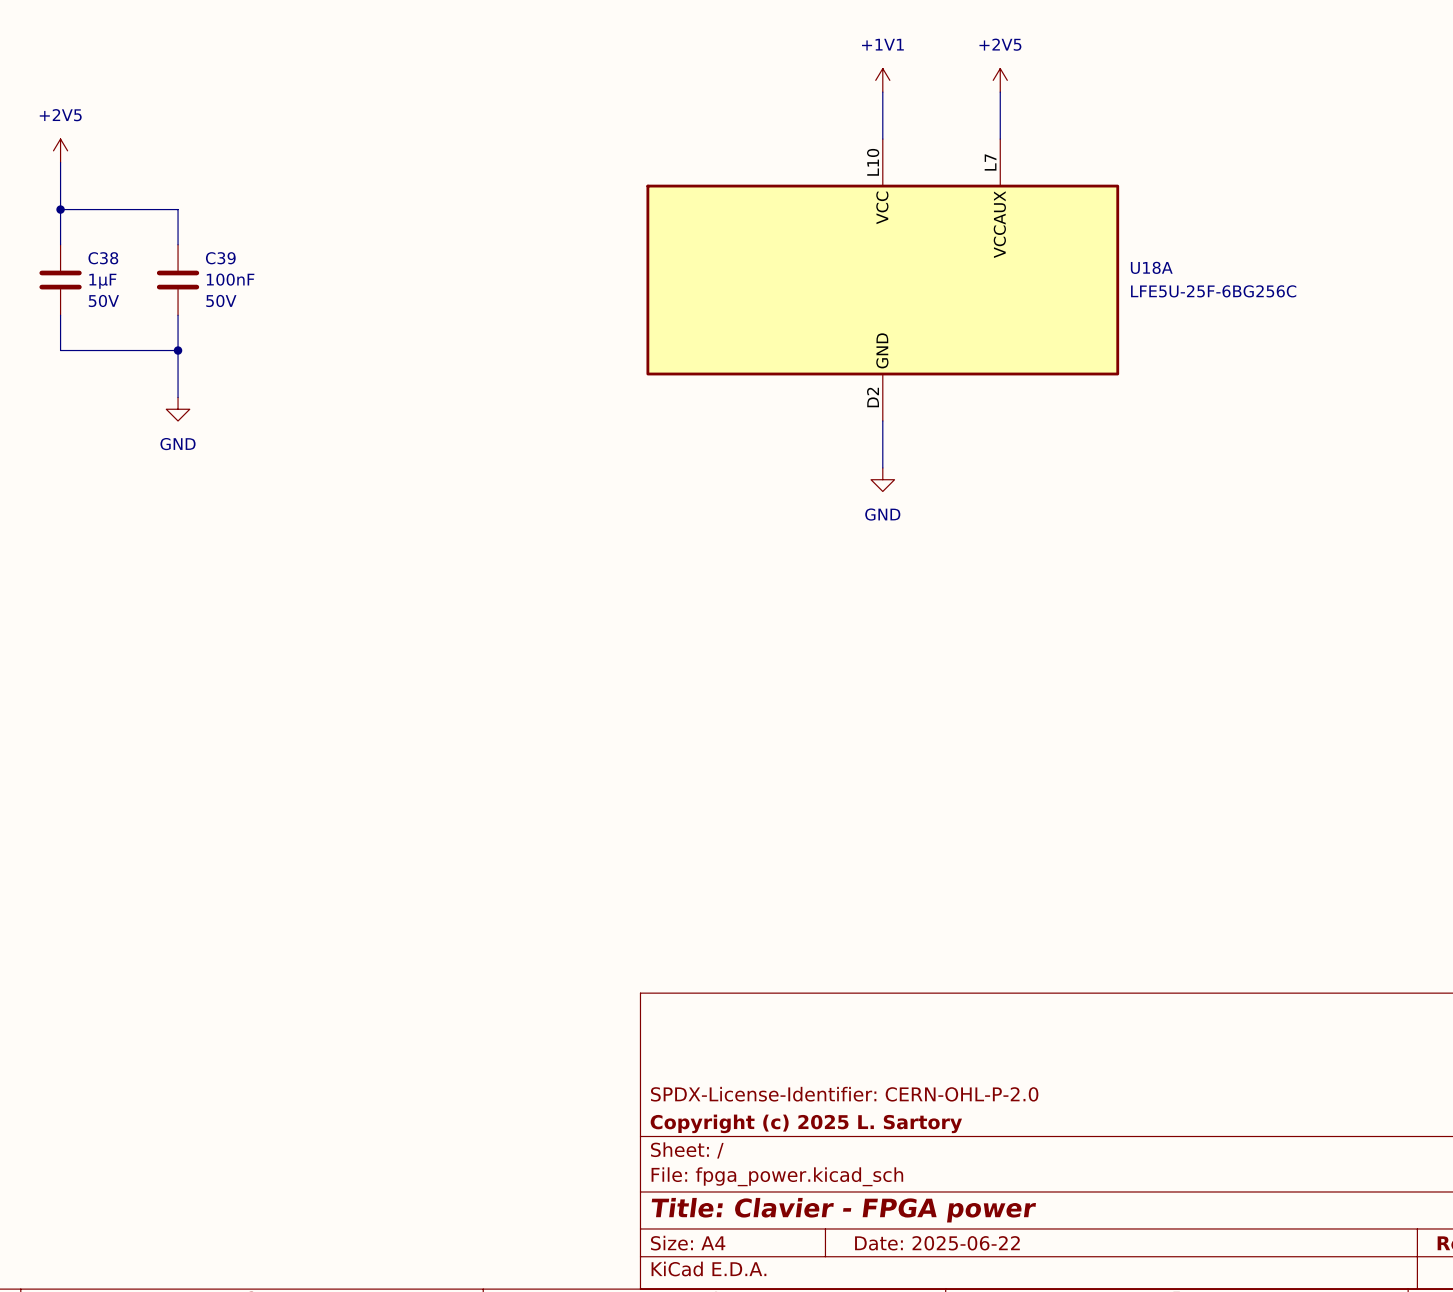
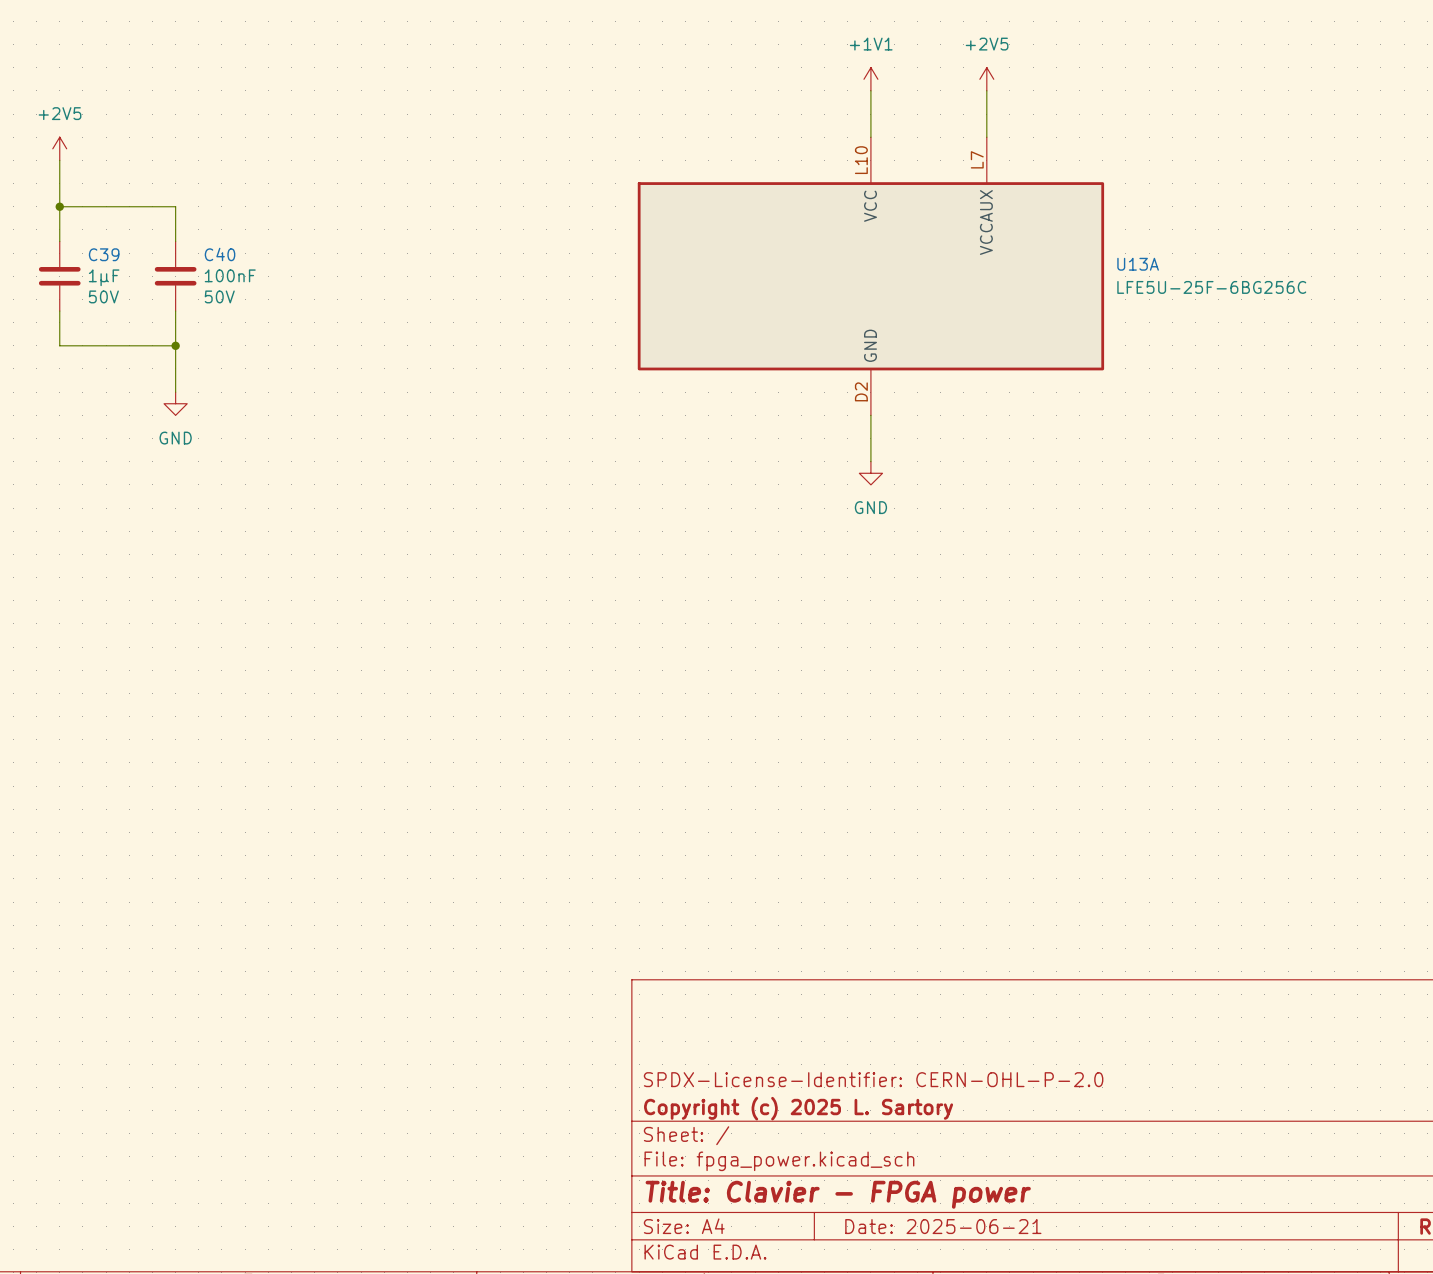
C38 name: C38 (103, 258) -> C39 (104, 254)
C39 name: C39 (220, 258) -> C40 (220, 254)
U18A name: U18A (1151, 267) -> U13A (1138, 264)
title block: Date: 2025-06-22 (937, 1243) -> Date: 2025-06-21 (943, 1226)

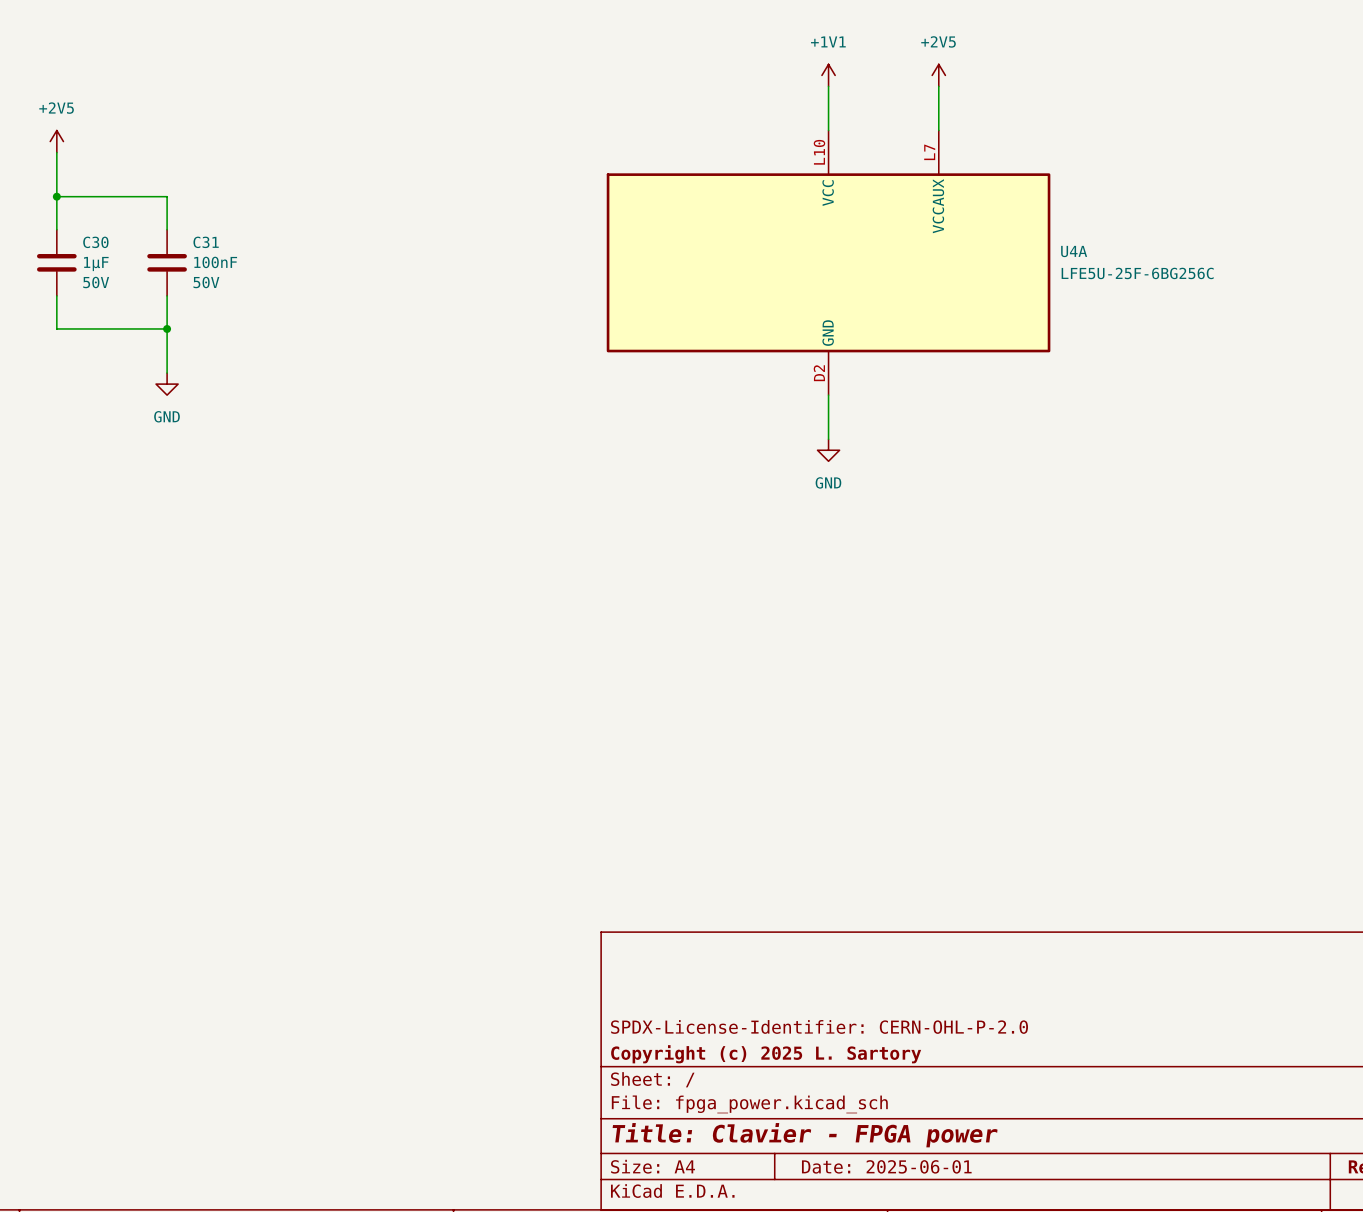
C39 name: C39 (104, 254) -> C30 (95, 242)
C40 name: C40 (220, 254) -> C31 (206, 242)
U13A name: U13A (1138, 264) -> U4A (1074, 251)
title block: Date: 2025-06-21 (943, 1226) -> Date: 2025-06-01 (886, 1166)

